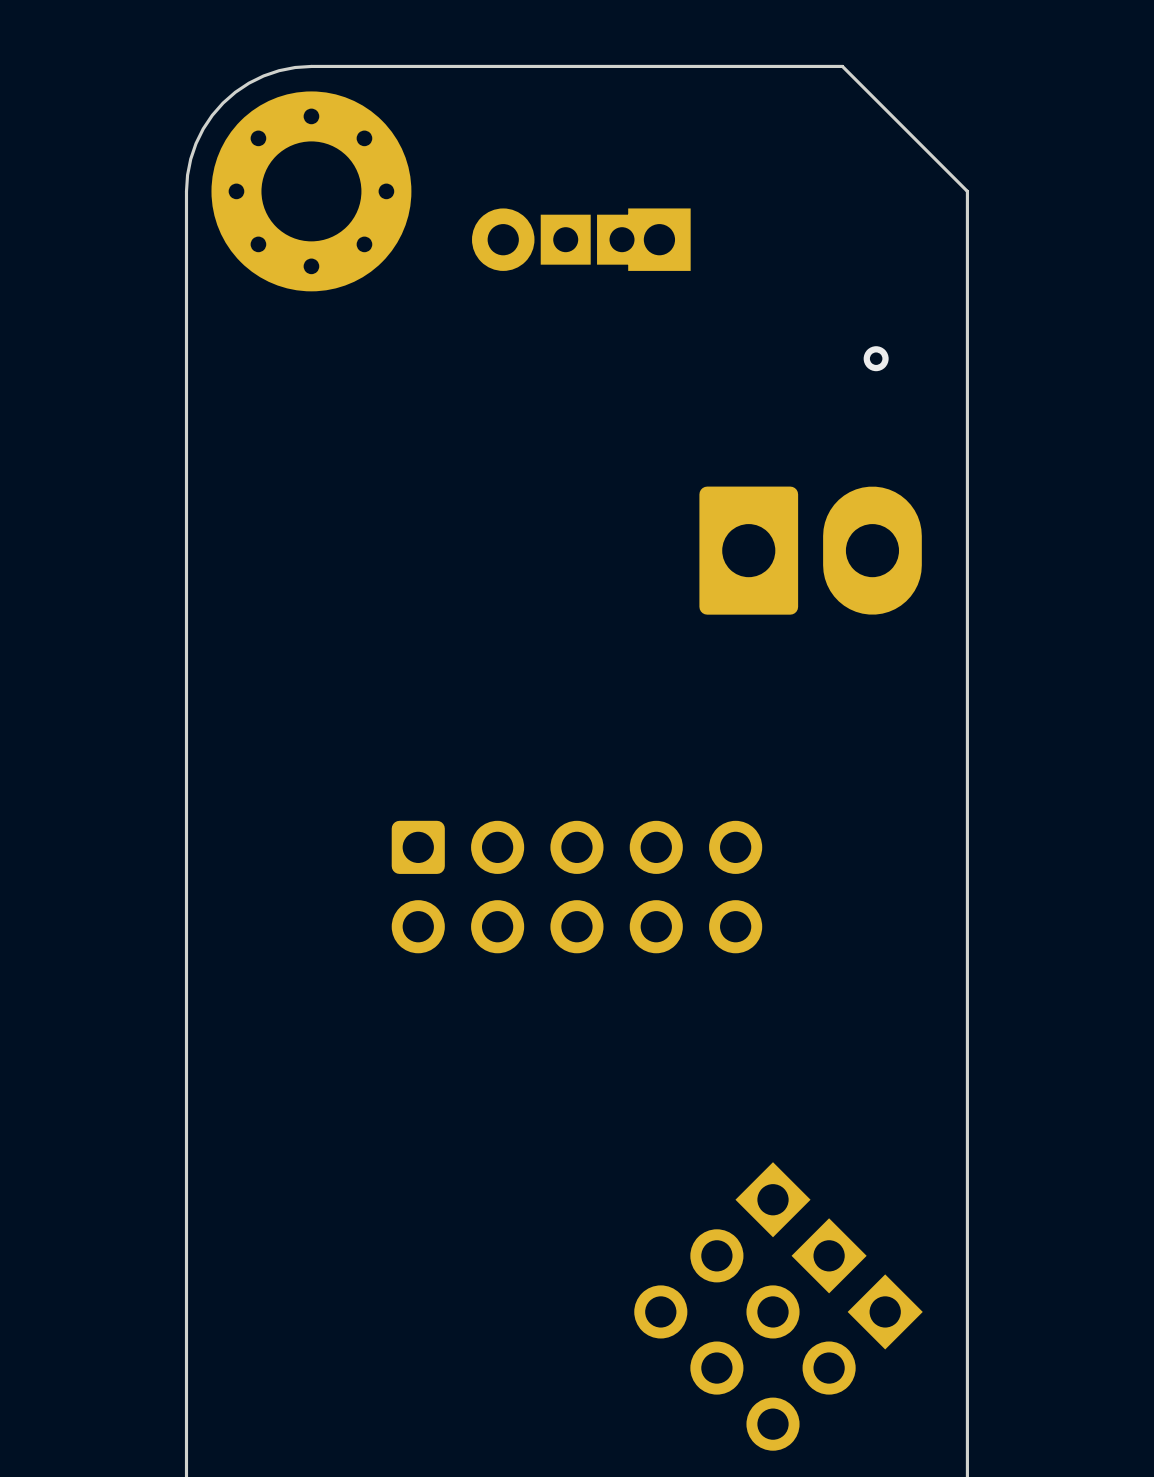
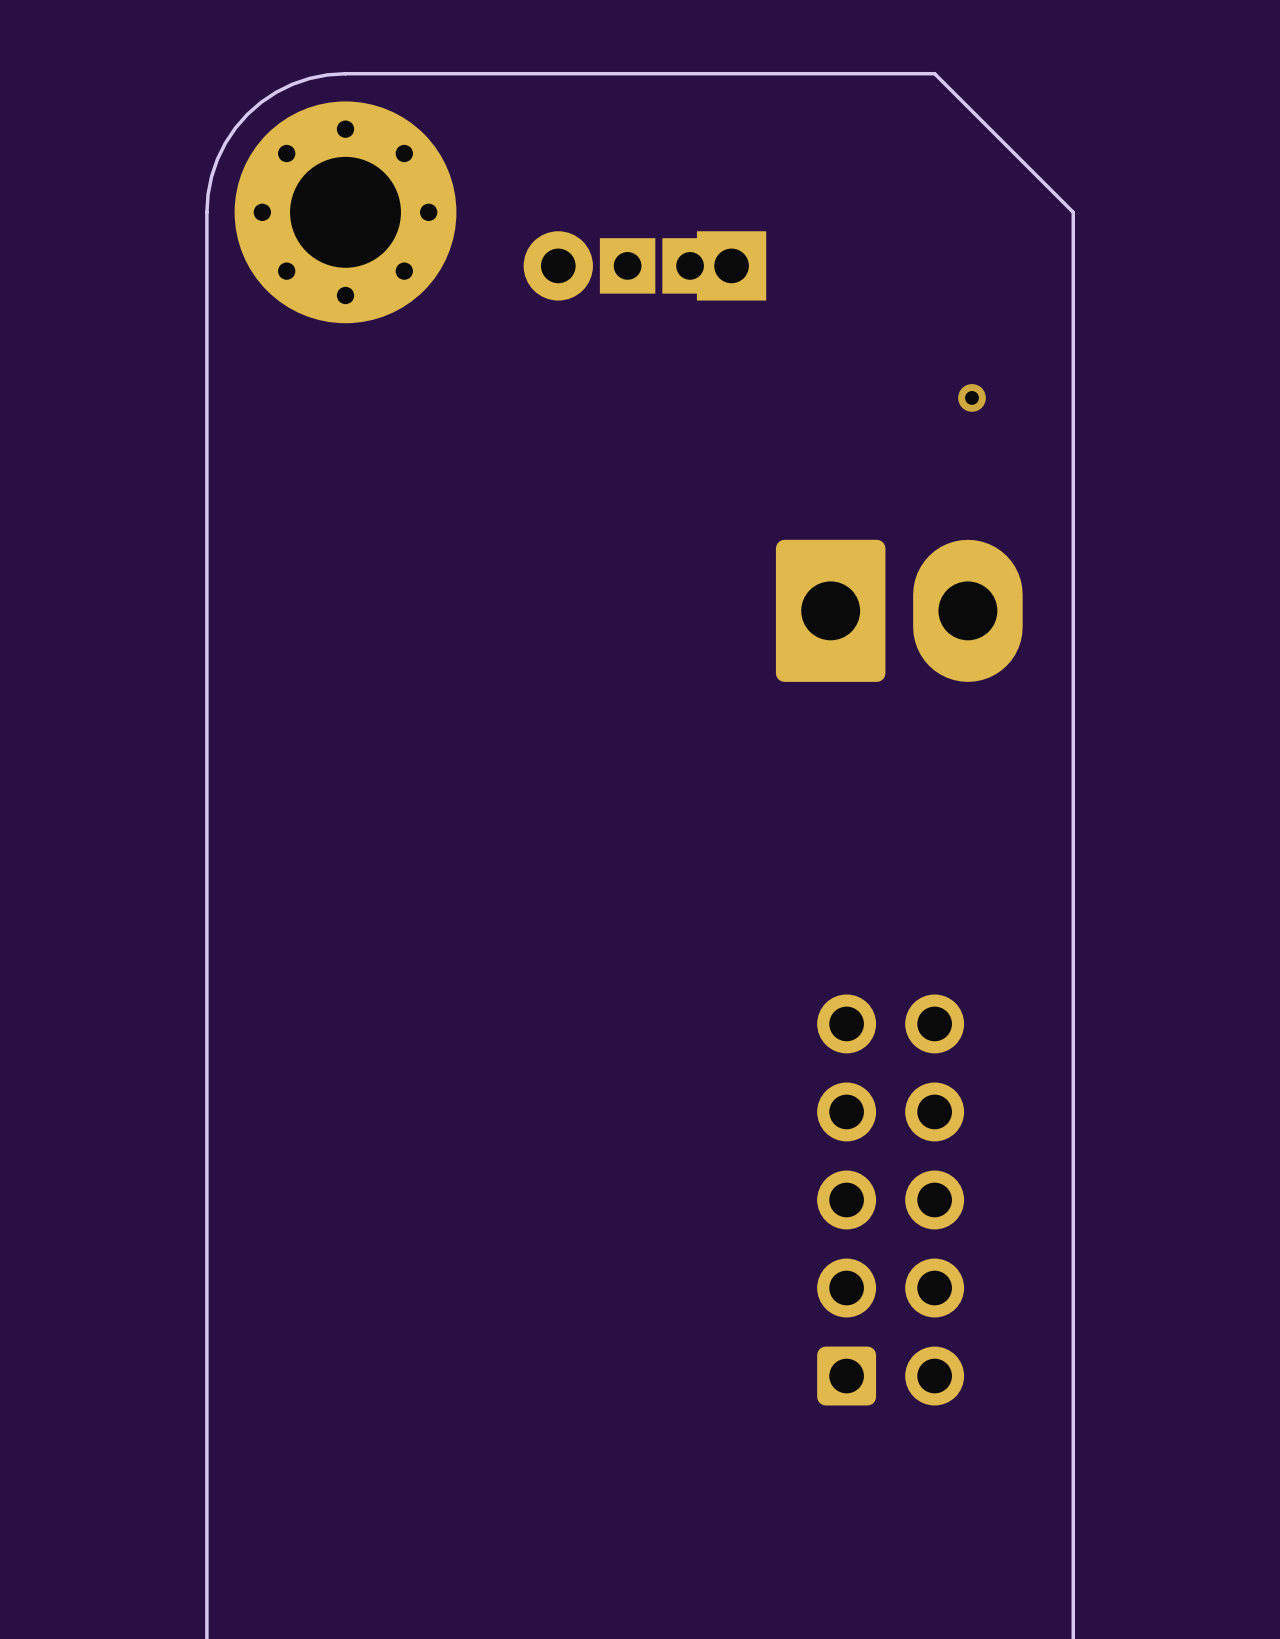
part rotation: 0° (576, 887) -> 90° counterclockwise (890, 1199)
part position: (576, 887) -> (890, 1199)
part: (722, 1250) -> none
part: (778, 1306) -> none
part: (834, 1362) -> none

